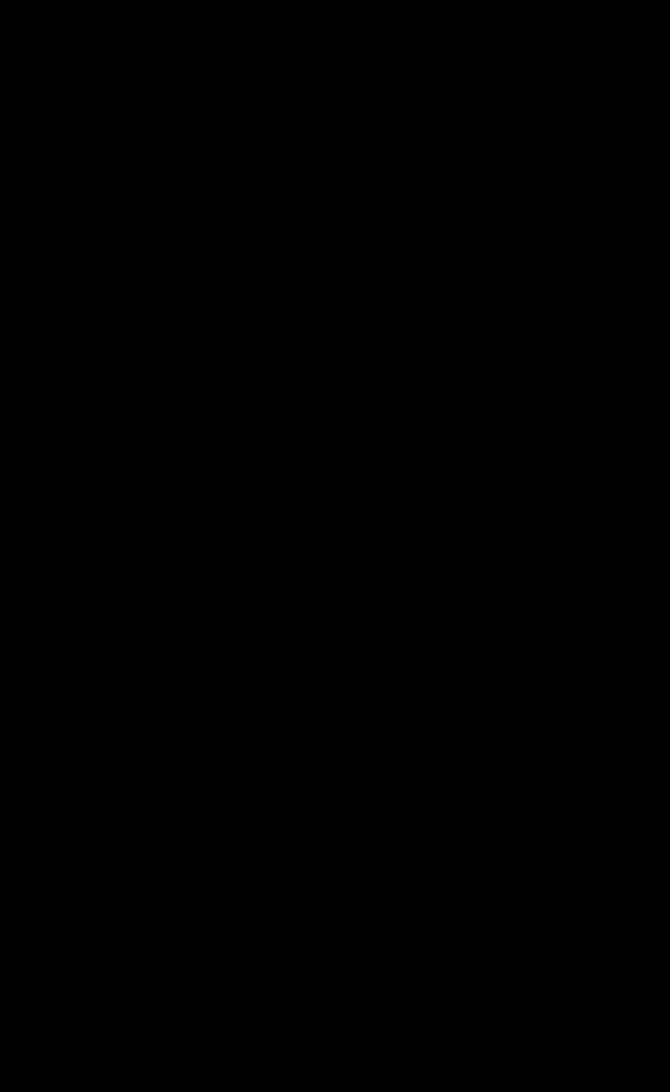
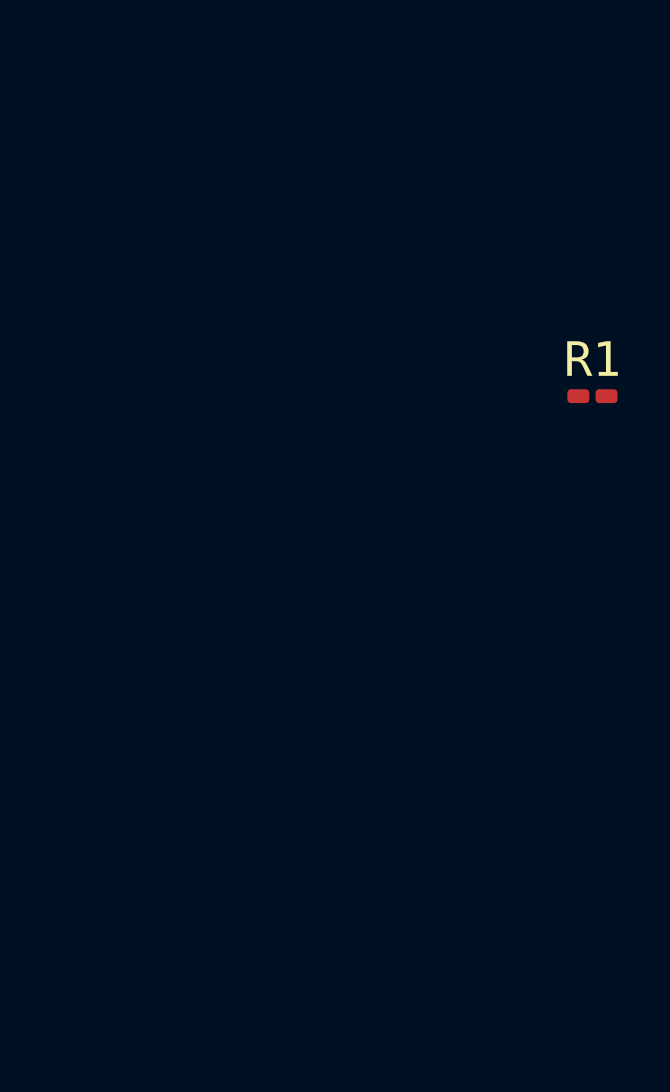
R1: none -> (592, 396)

